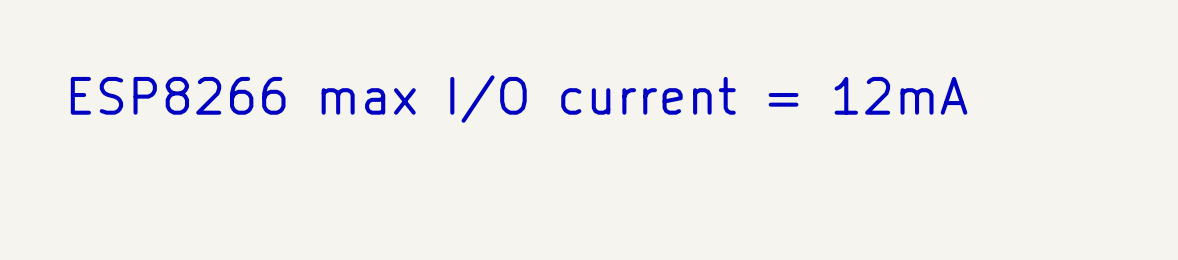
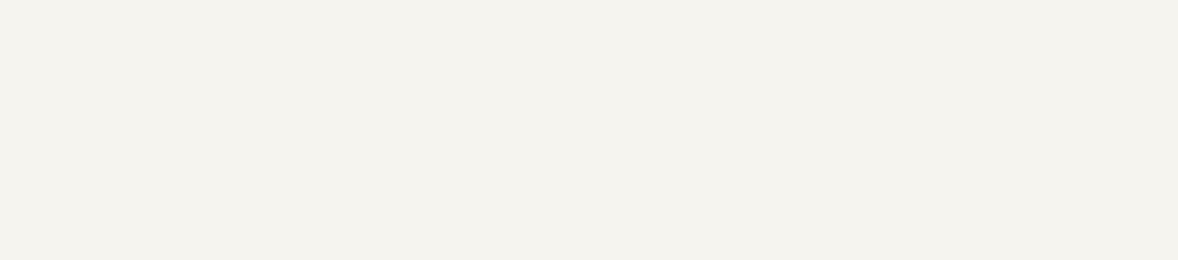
text: ESP8266 max I/O current = 12mA (519, 99) -> none

